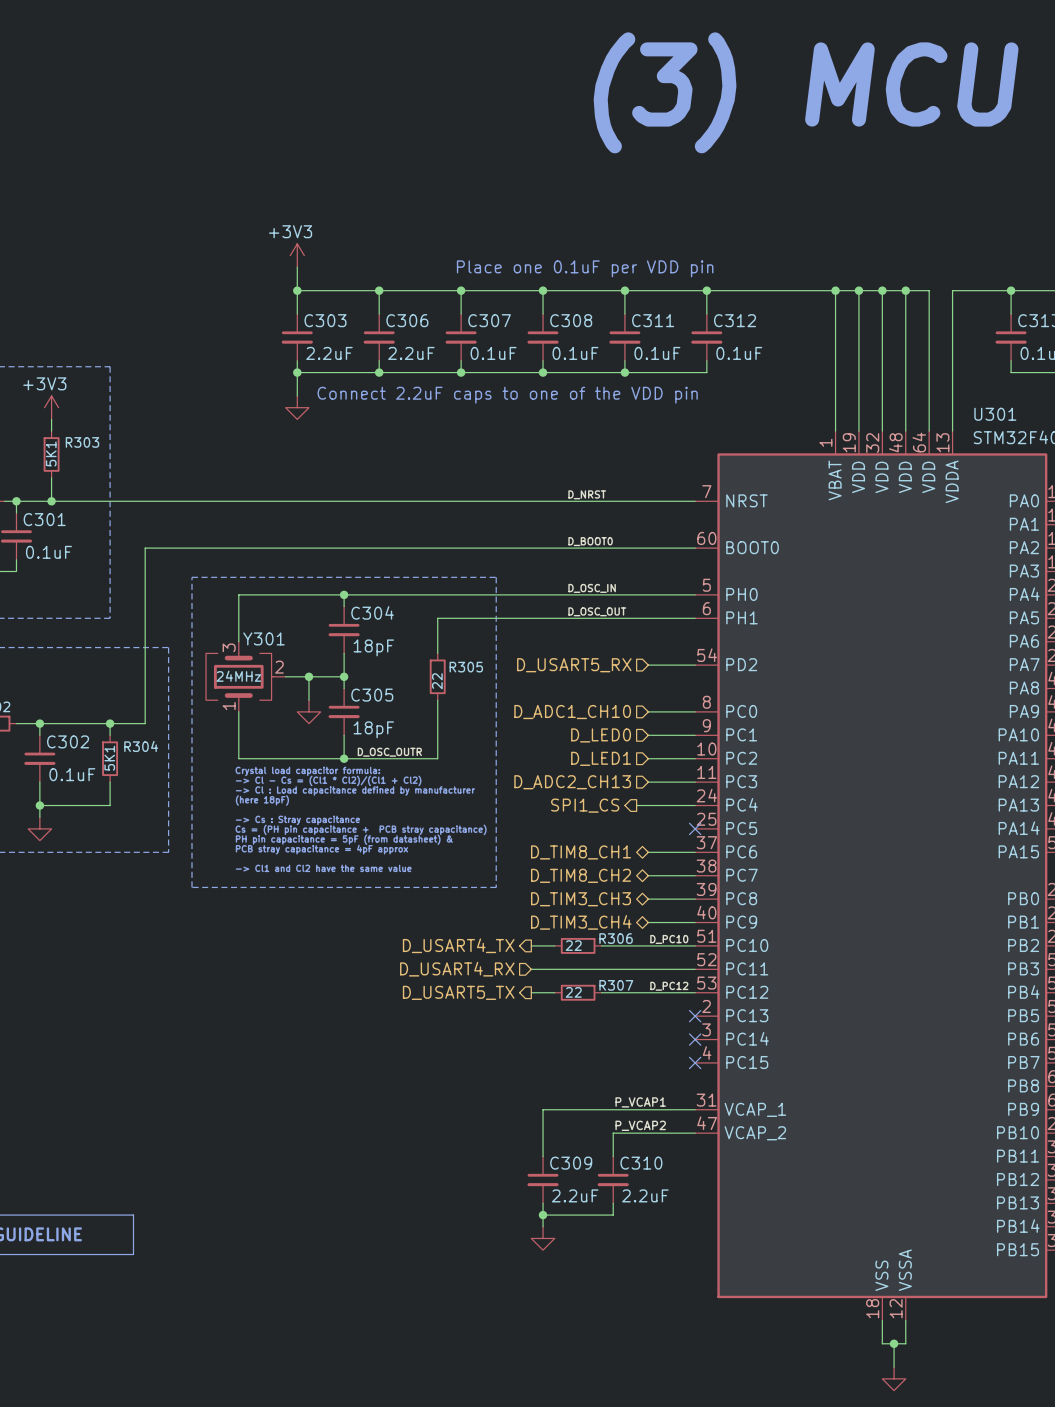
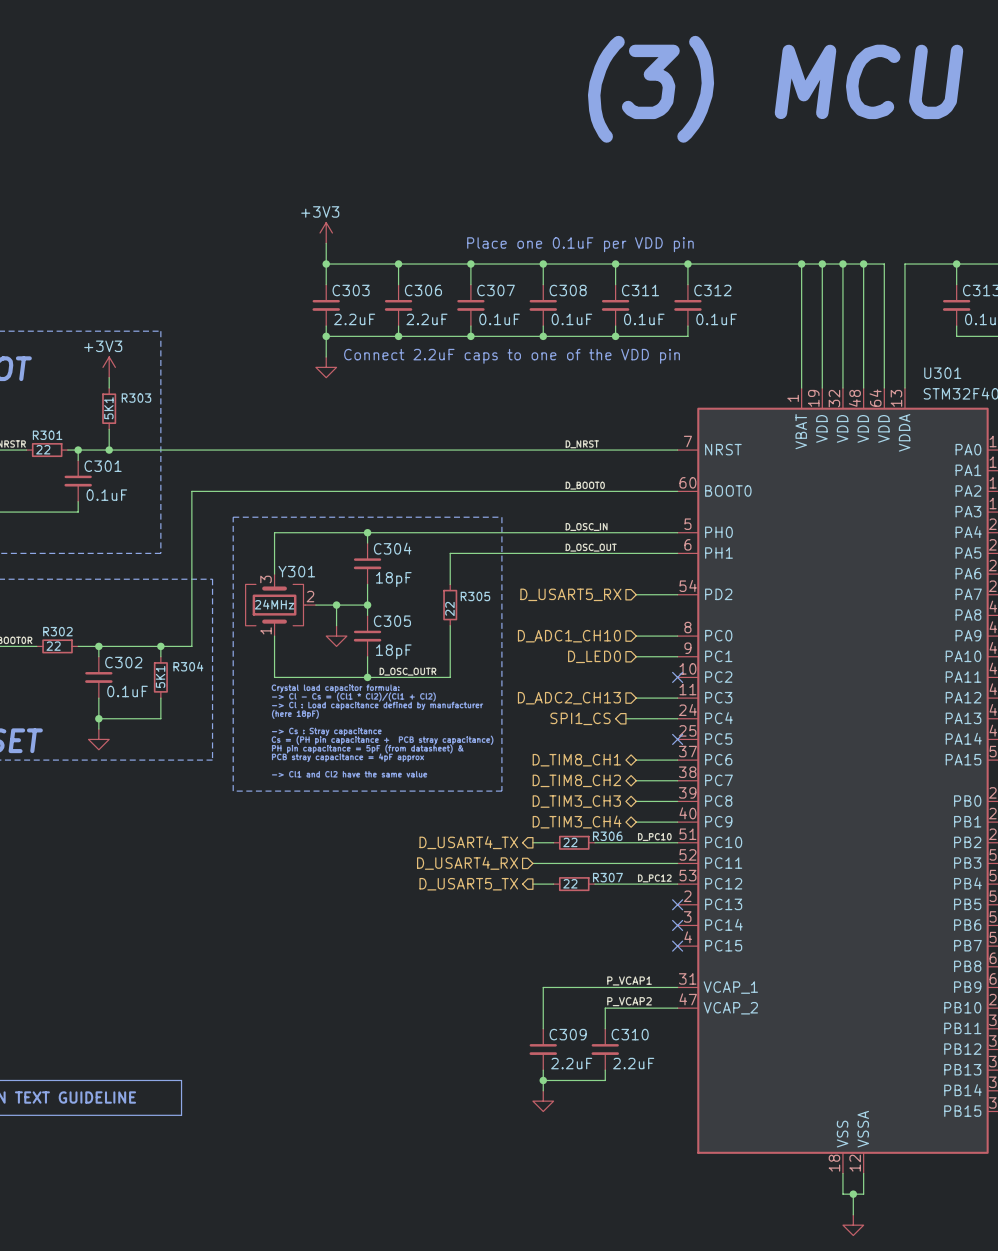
hierarchical label: D_LED1 (601, 758) -> none
wire: (648, 758) (695, 758) -> none
no-connect mark: none -> (677, 677)

